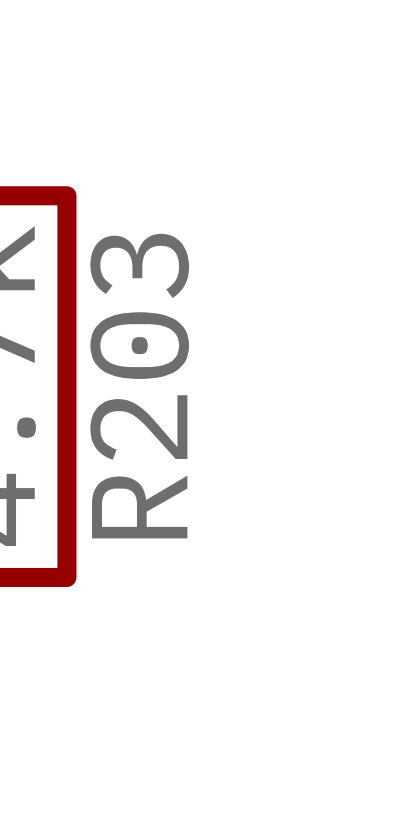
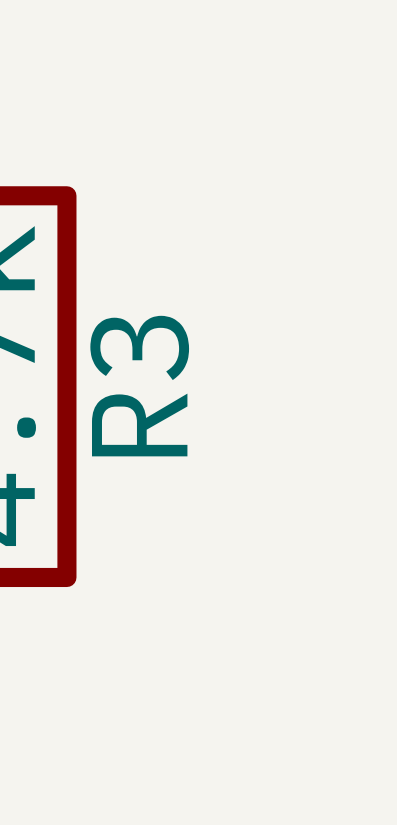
R203 name: R203 (139, 386) -> R3 (139, 386)

